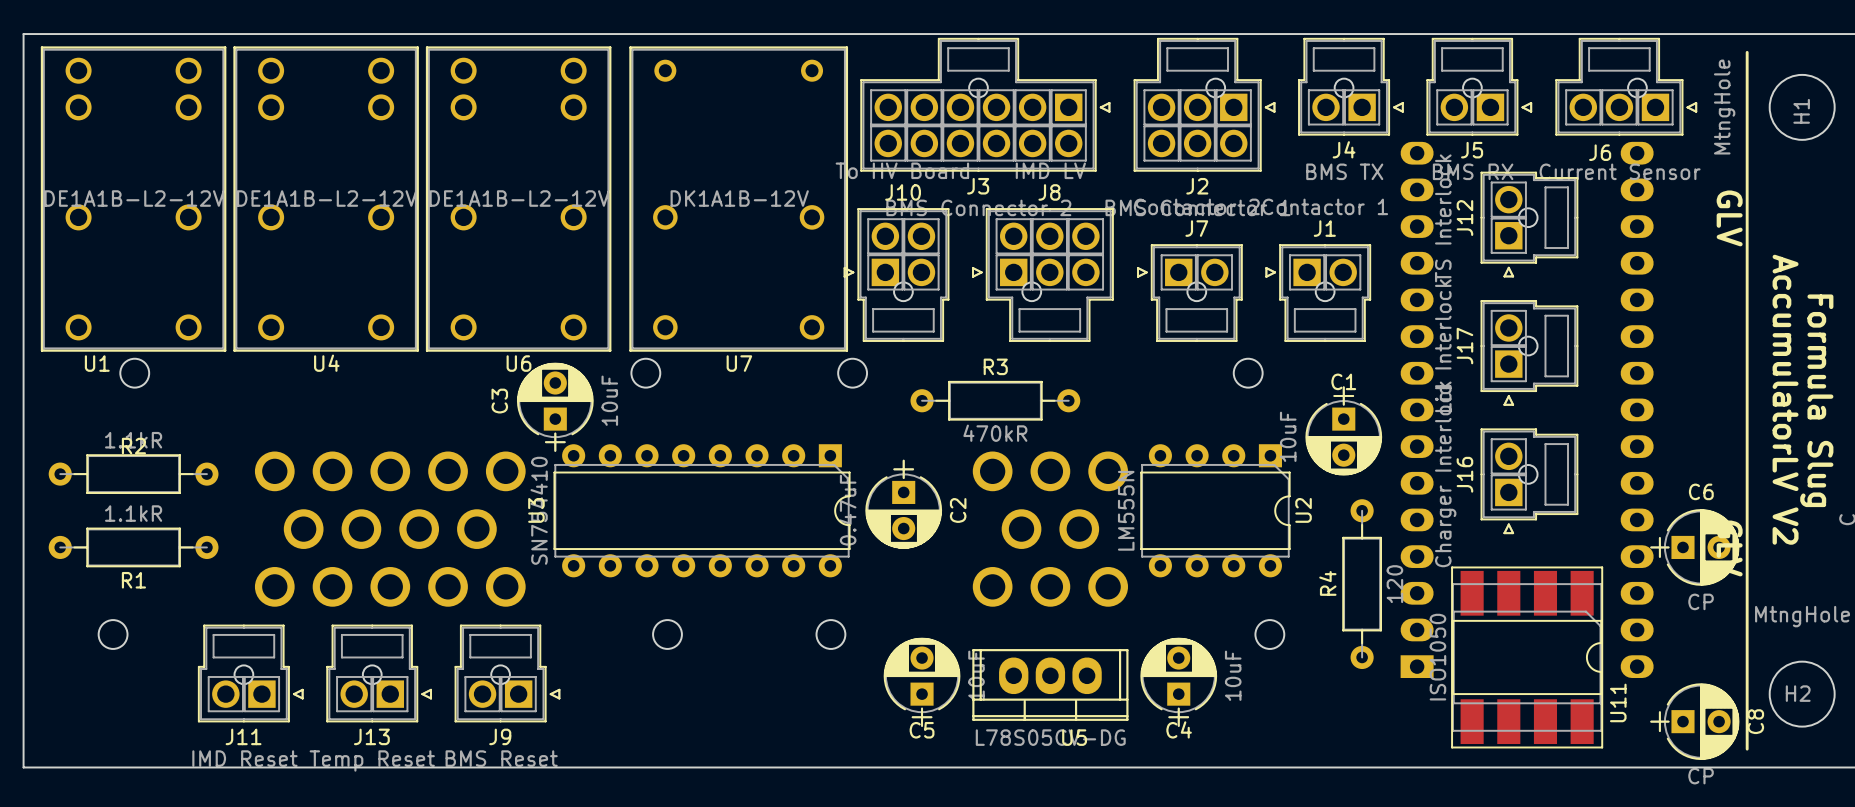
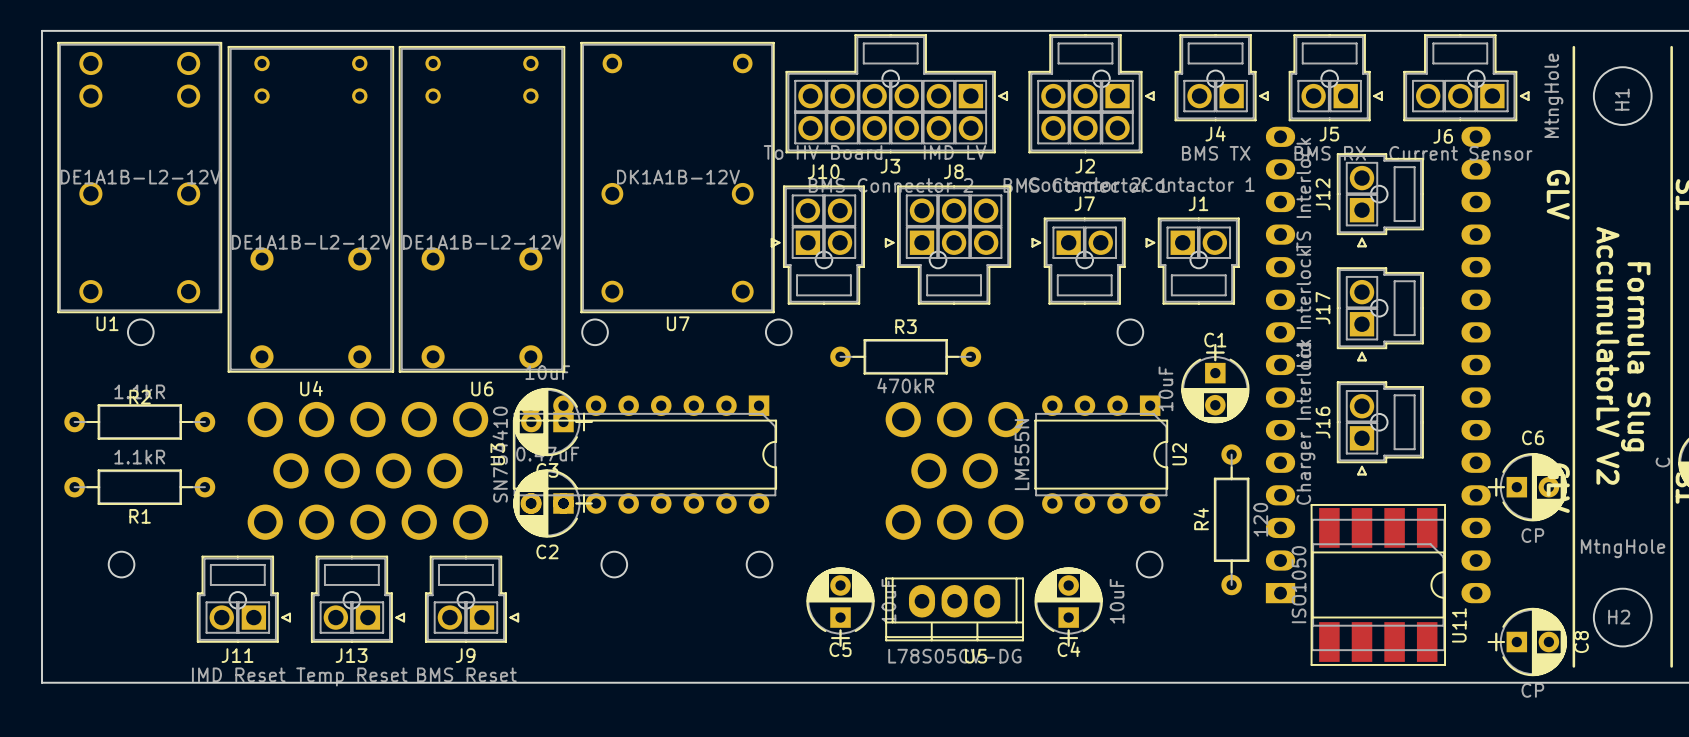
U4 footprint: [233, 46, 419, 352] -> [227, 45, 395, 373]
U6 footprint: [425, 46, 612, 352] -> [398, 45, 566, 373]
U4 value position: DE1A1B-L2-12V (327, 198) -> DE1A1B-L2-12V (311, 242)
U6 value position: DE1A1B-L2-12V (519, 198) -> DE1A1B-L2-12V (482, 242)
U4 name position: U4 (326, 363) -> U4 (311, 388)
U6 name position: U6 (518, 363) -> U6 (482, 388)
C3 rotation: 0° (555, 407) -> 90° counterclockwise (552, 422)
C3 position: (555, 407) -> (552, 422)
C2 rotation: 0° (903, 504) -> 90° clockwise (552, 503)
C2 position: (903, 504) -> (552, 503)

